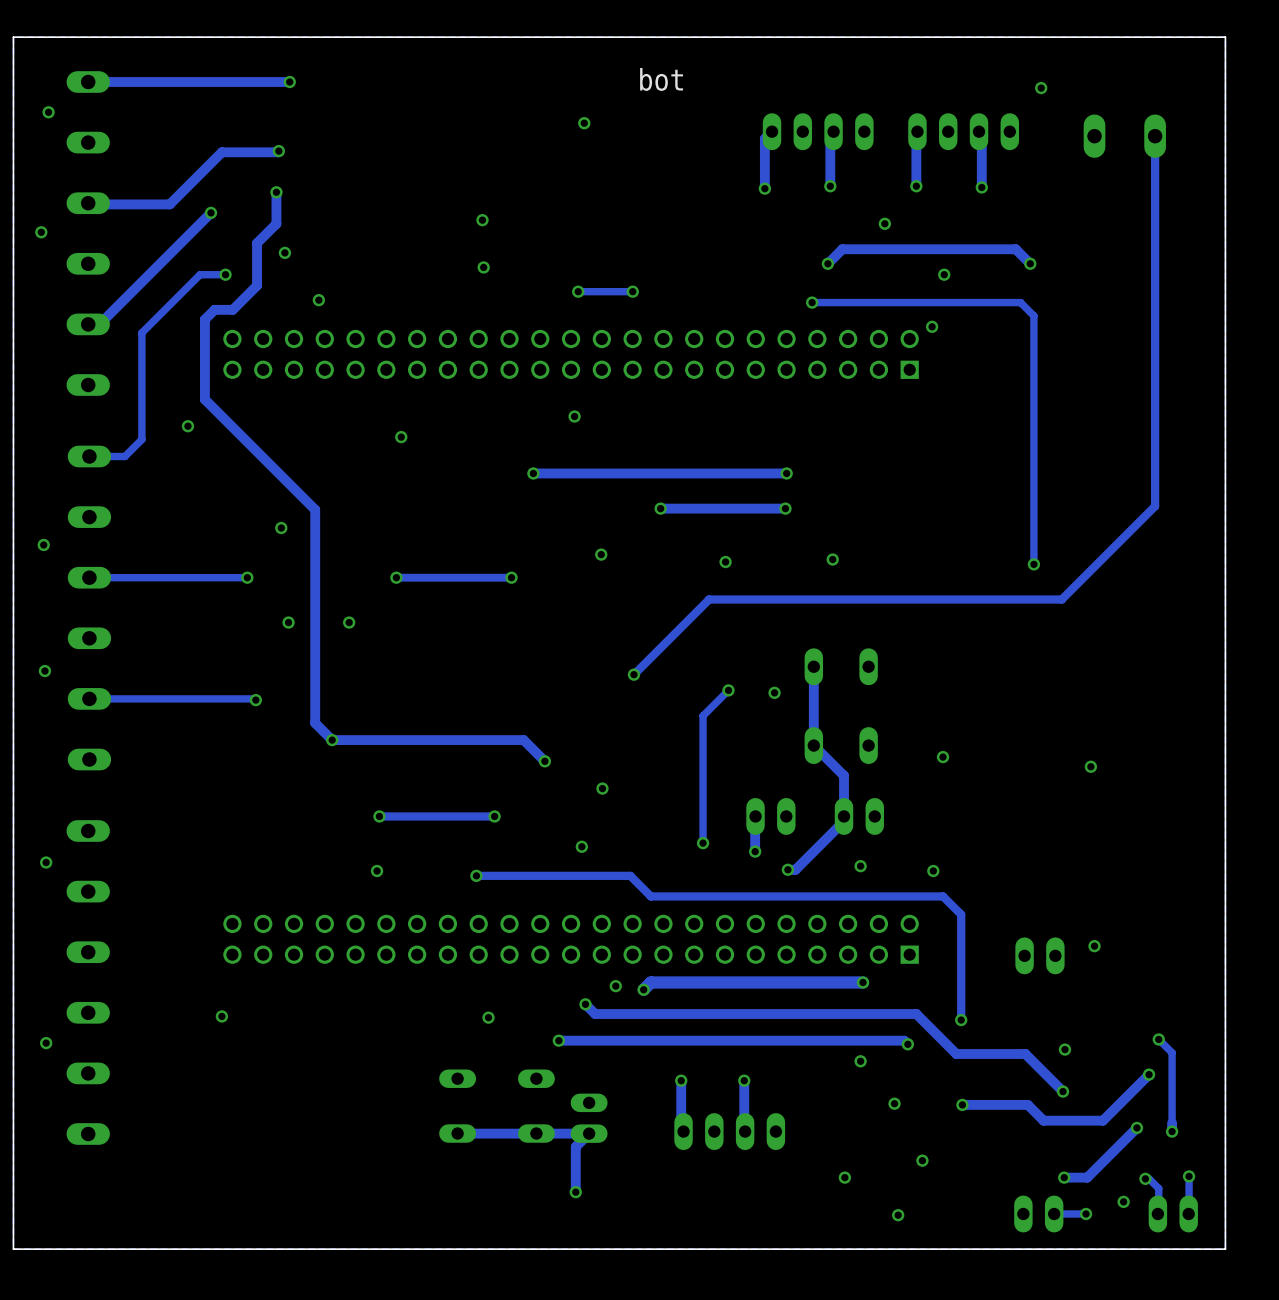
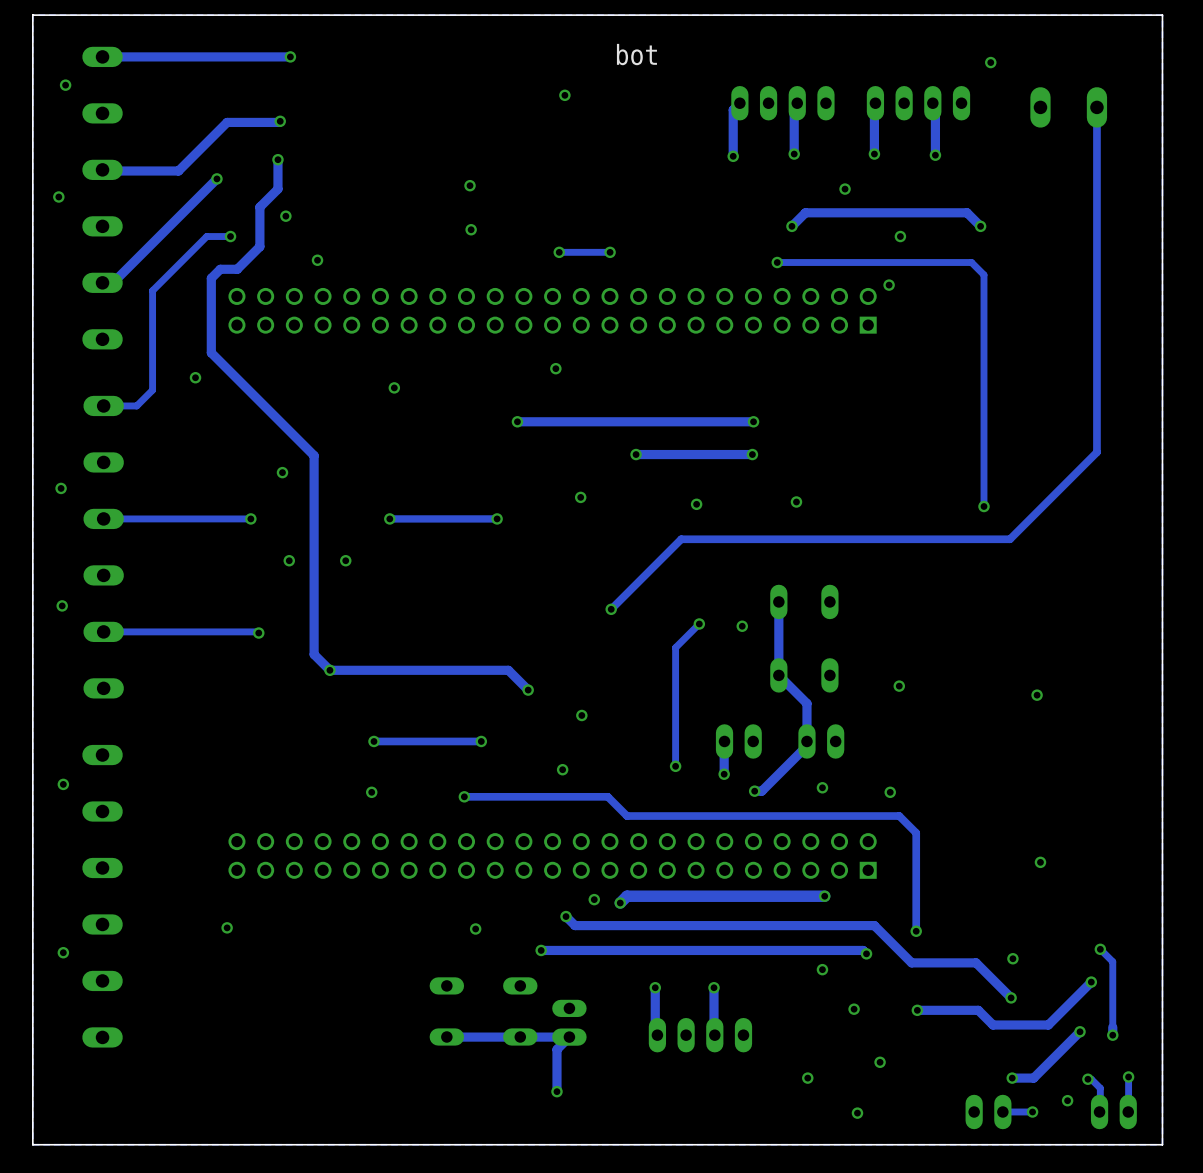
part: (1039, 955) -> none

